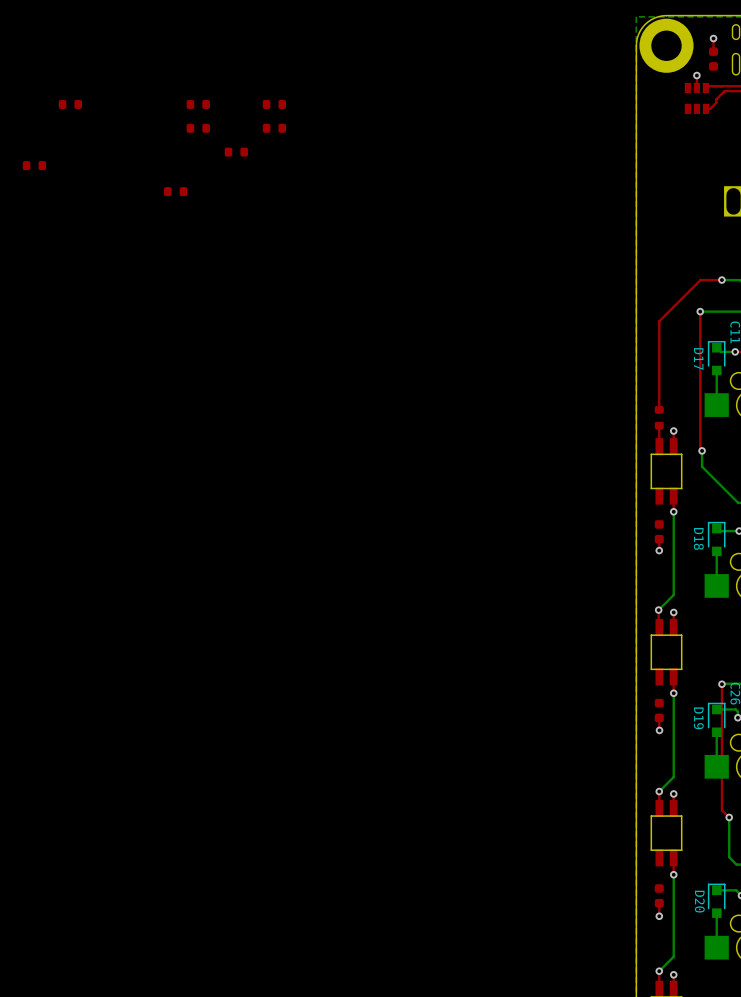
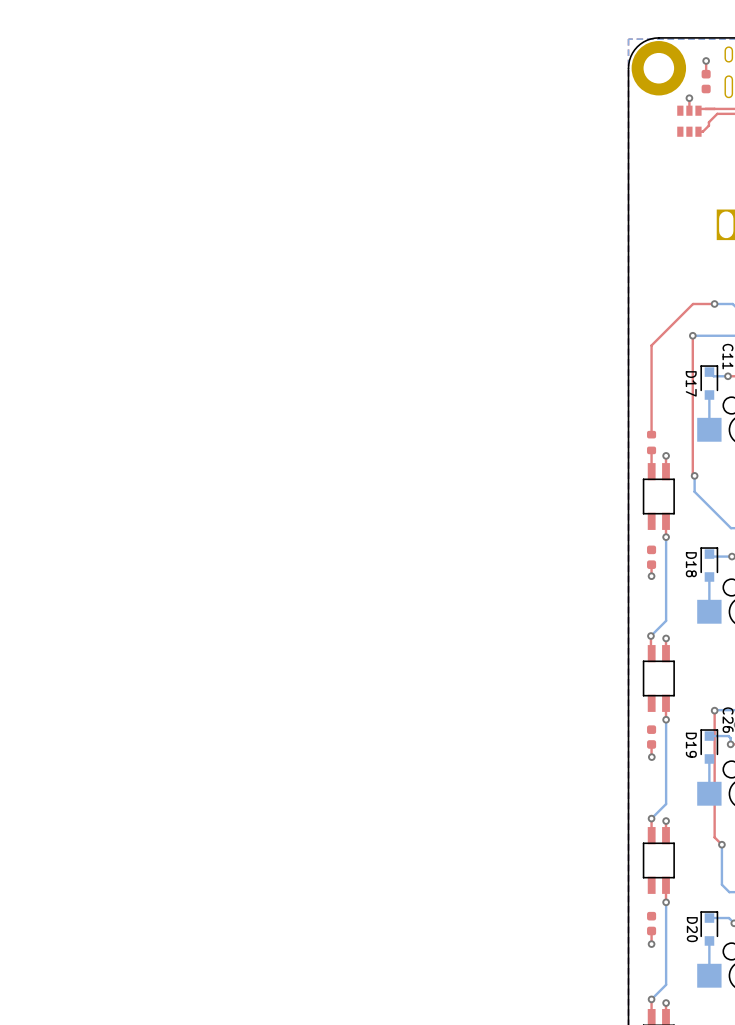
part: (70, 104) -> none
part: (198, 104) -> none
part: (274, 104) -> none
part: (198, 128) -> none
part: (274, 128) -> none
part: (236, 152) -> none
part: (34, 165) -> none
part: (175, 191) -> none

